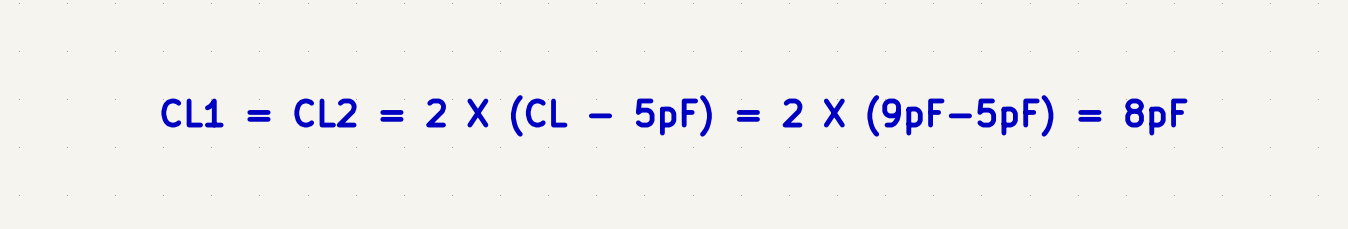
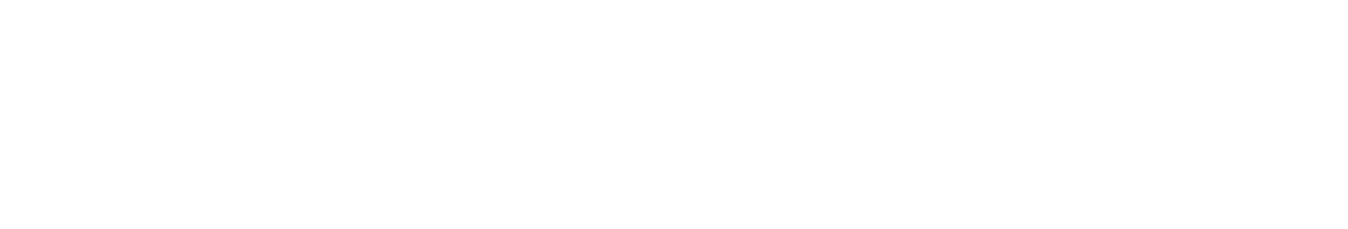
text: CL1 = CL2 = 2 X (CL - 5pF) = 2 X (9pF-5pF) = 8pF (674, 115) -> none

